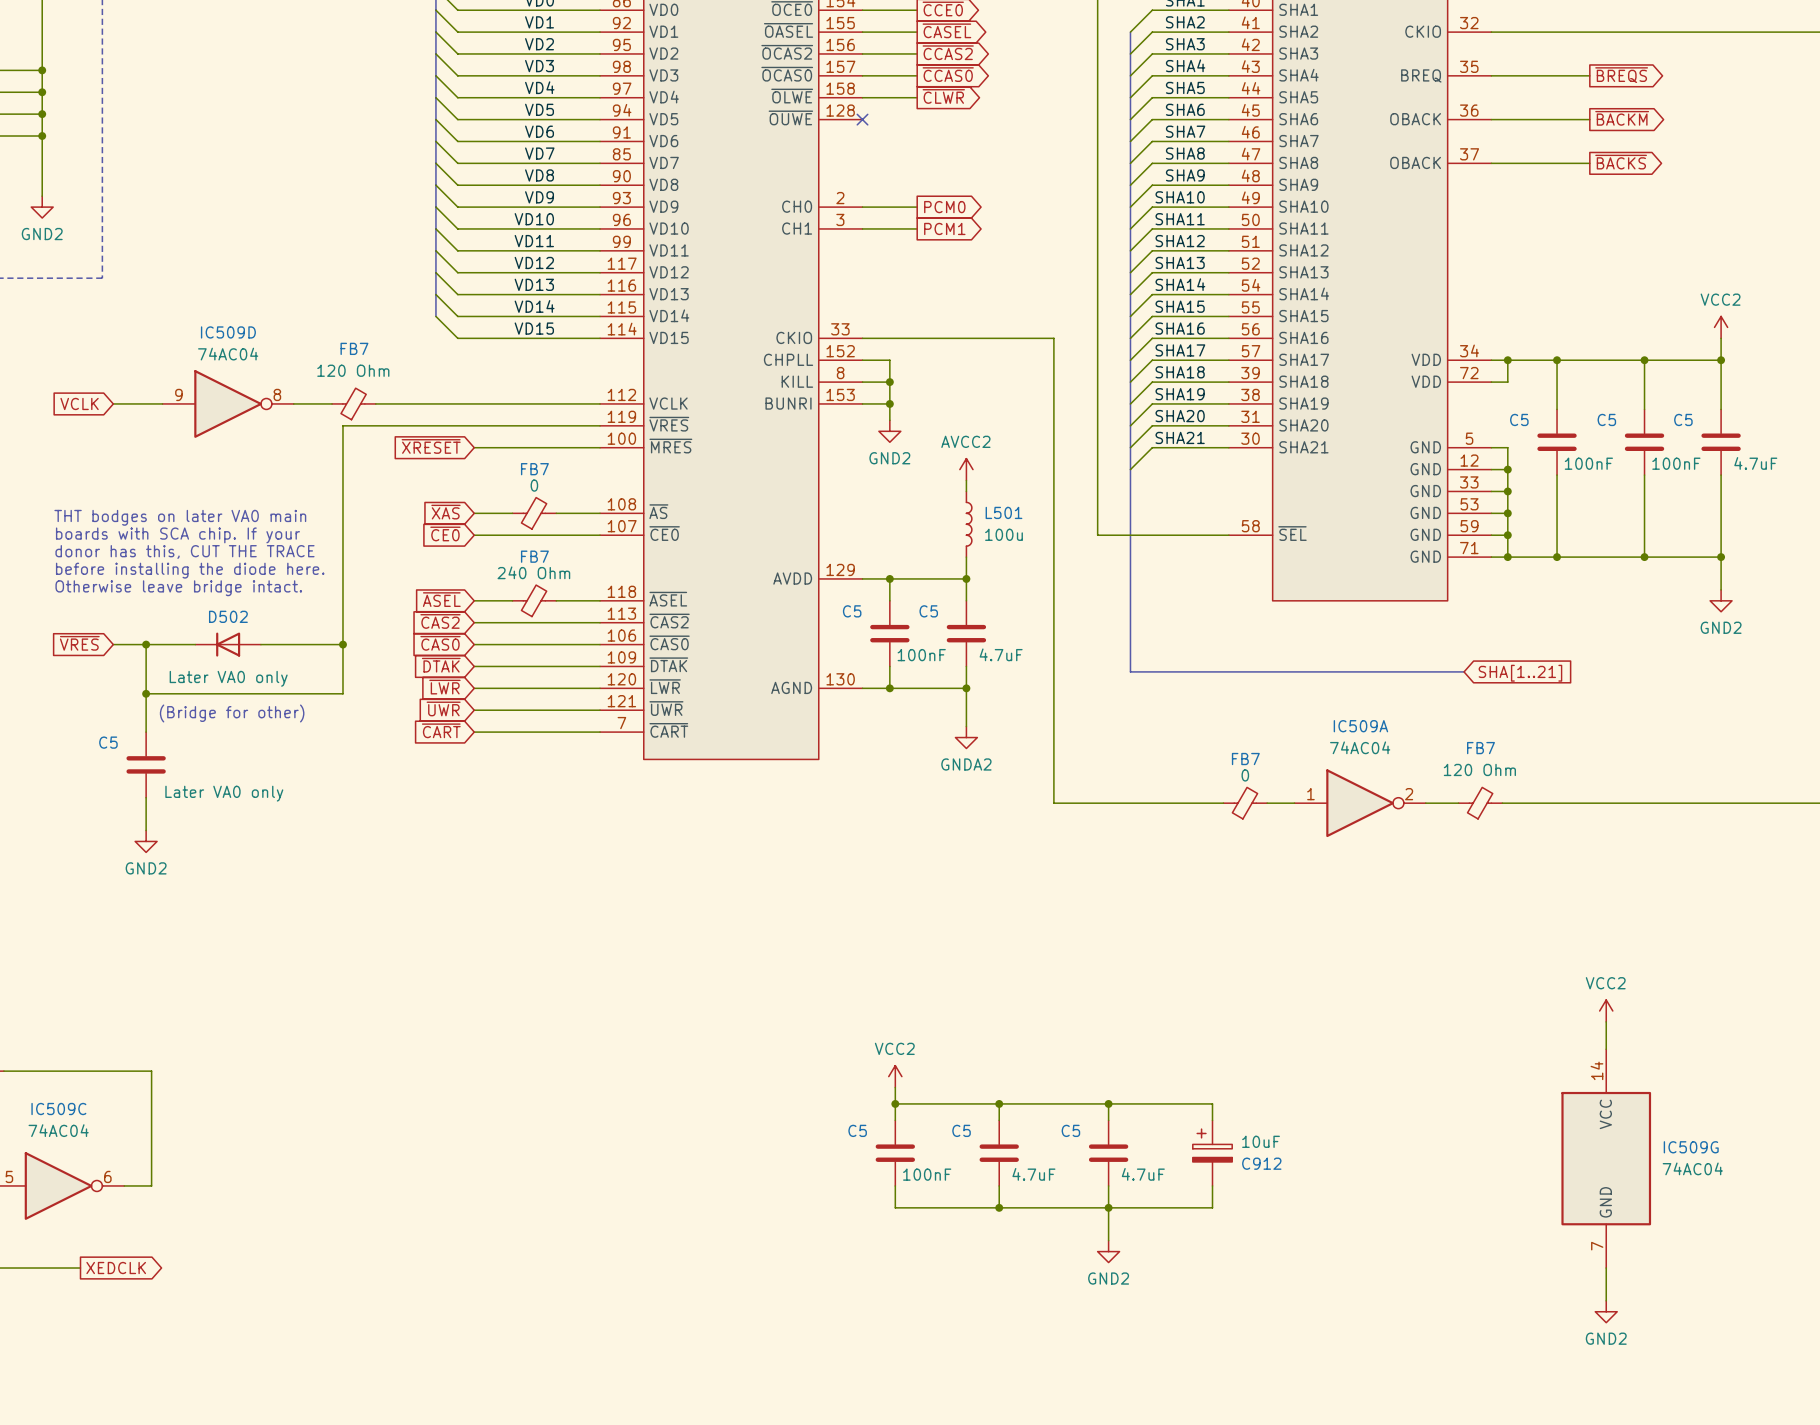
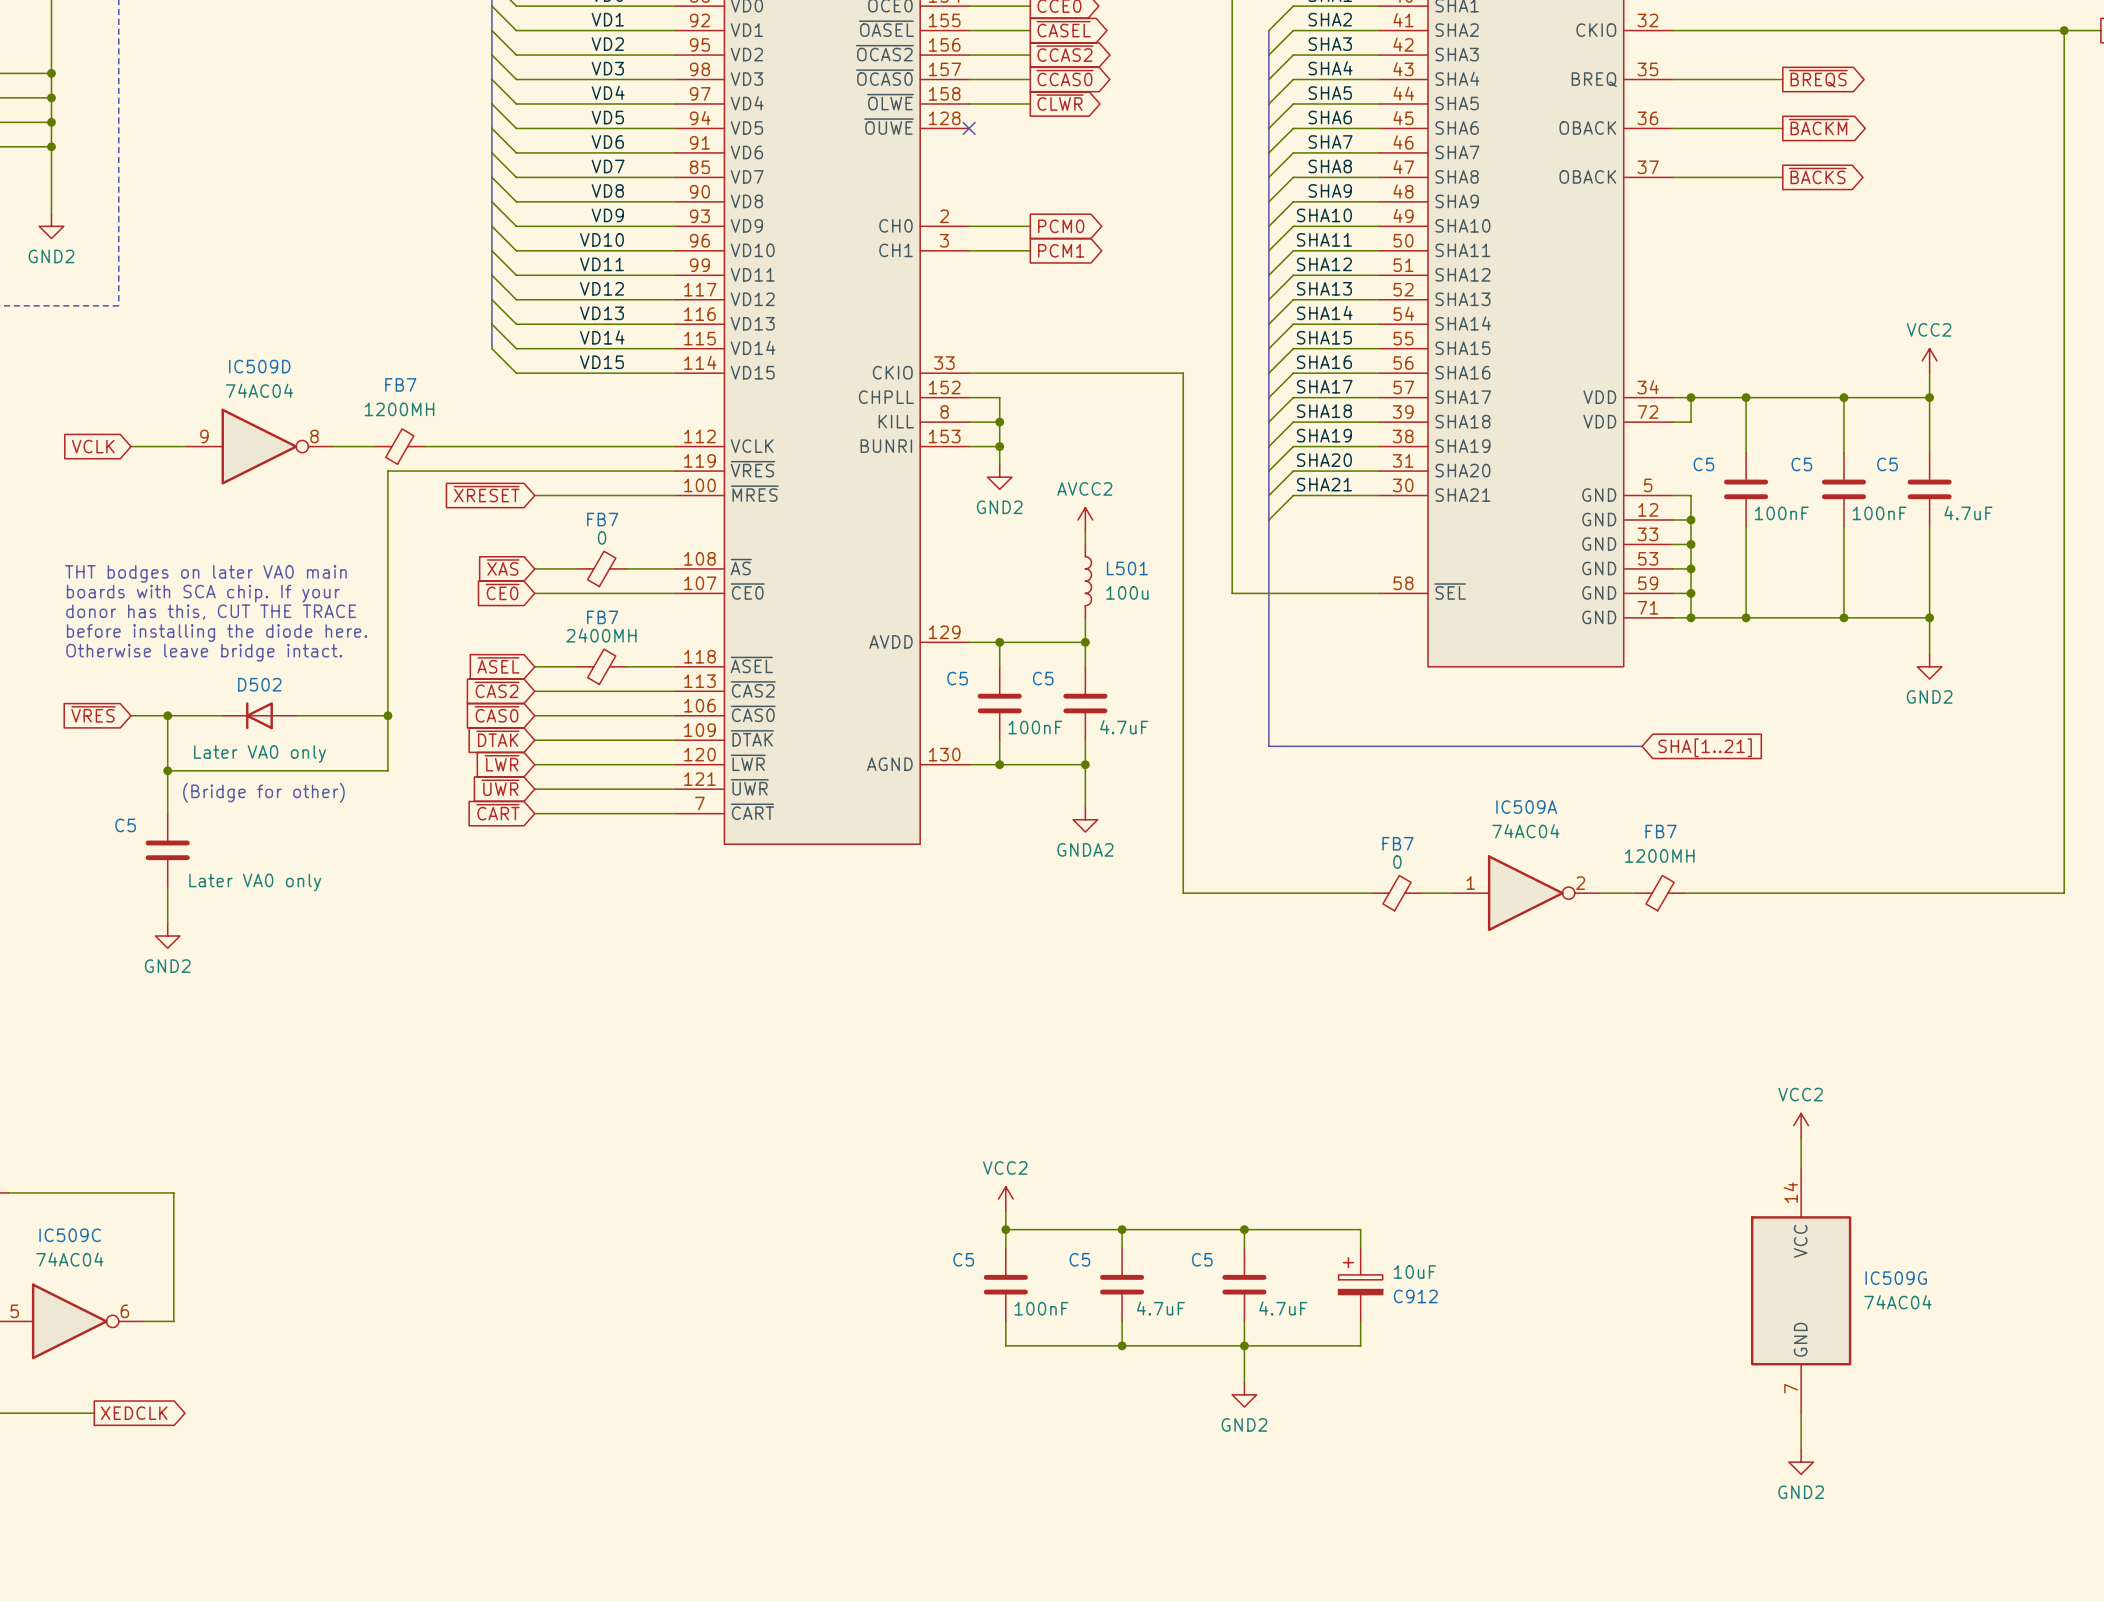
FB7 value: 120 Ohm (353, 370) -> 1200MH (399, 409)
FB7 value: 240 Ohm (533, 572) -> 2400MH (601, 635)
FB7 value: 120 Ohm (1479, 769) -> 1200MH (1659, 856)

